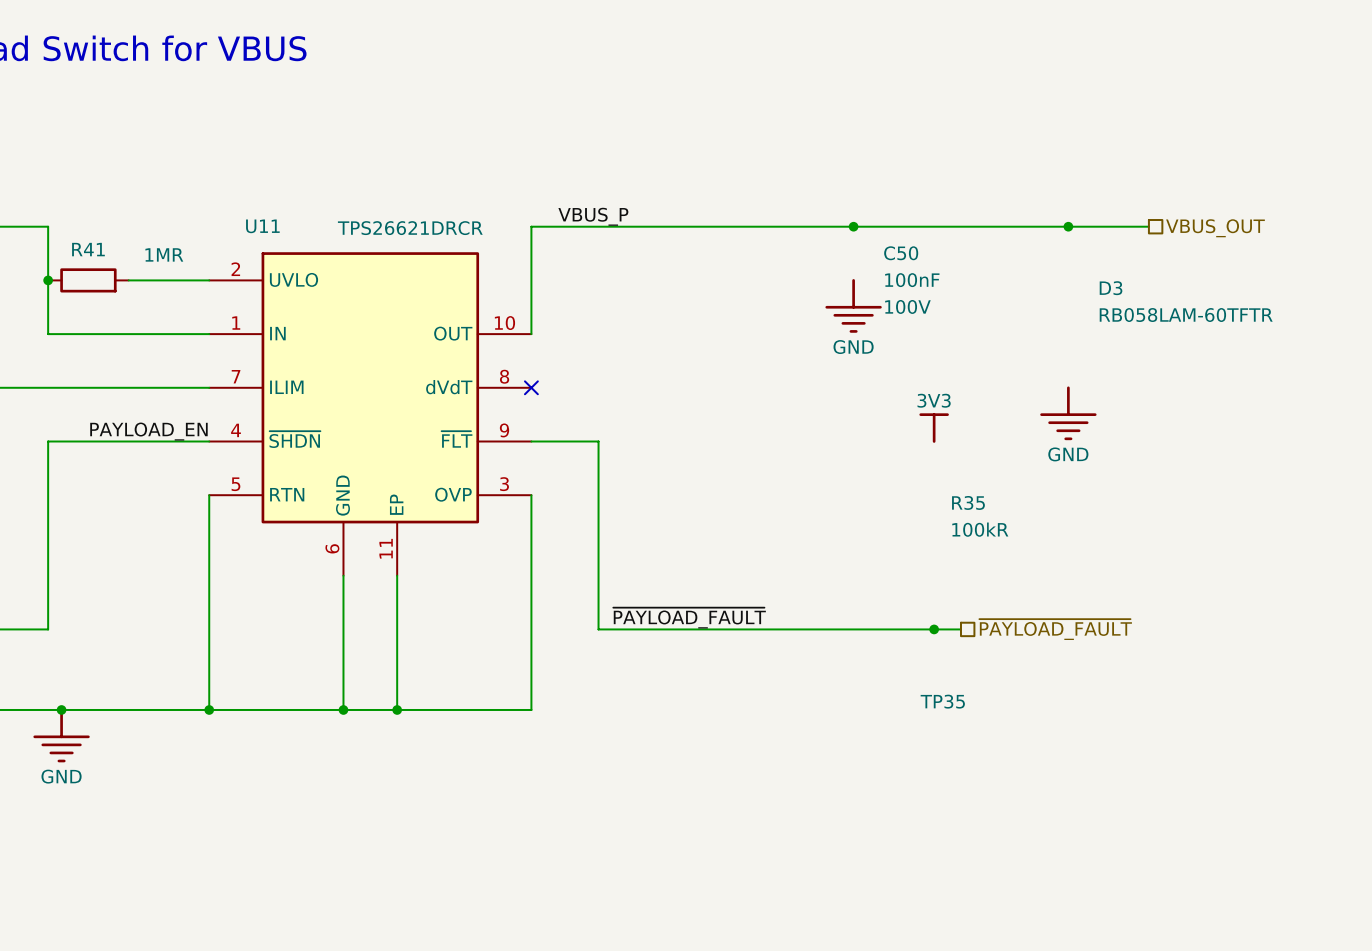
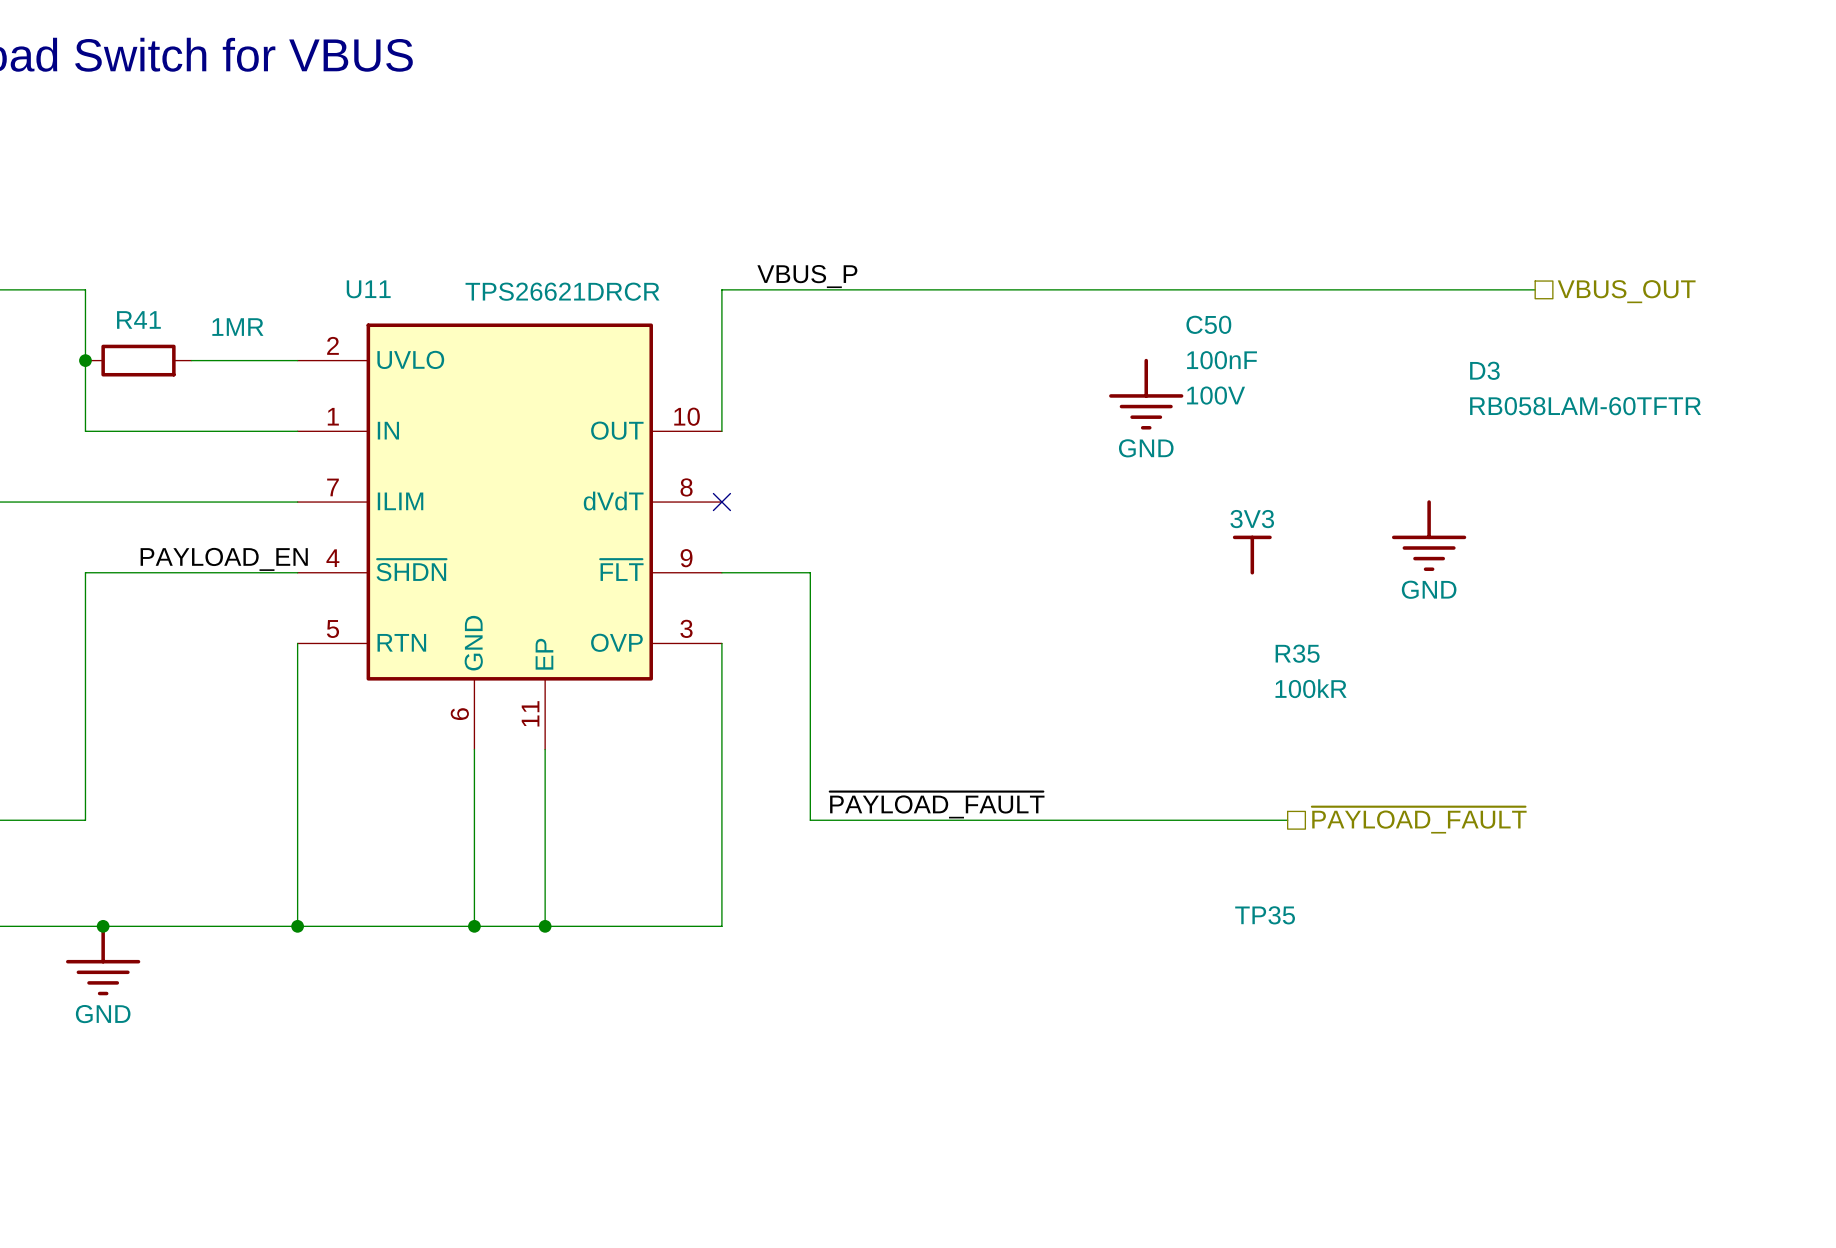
junction: (853, 226) -> none
junction: (1068, 226) -> none
junction: (934, 629) -> none

